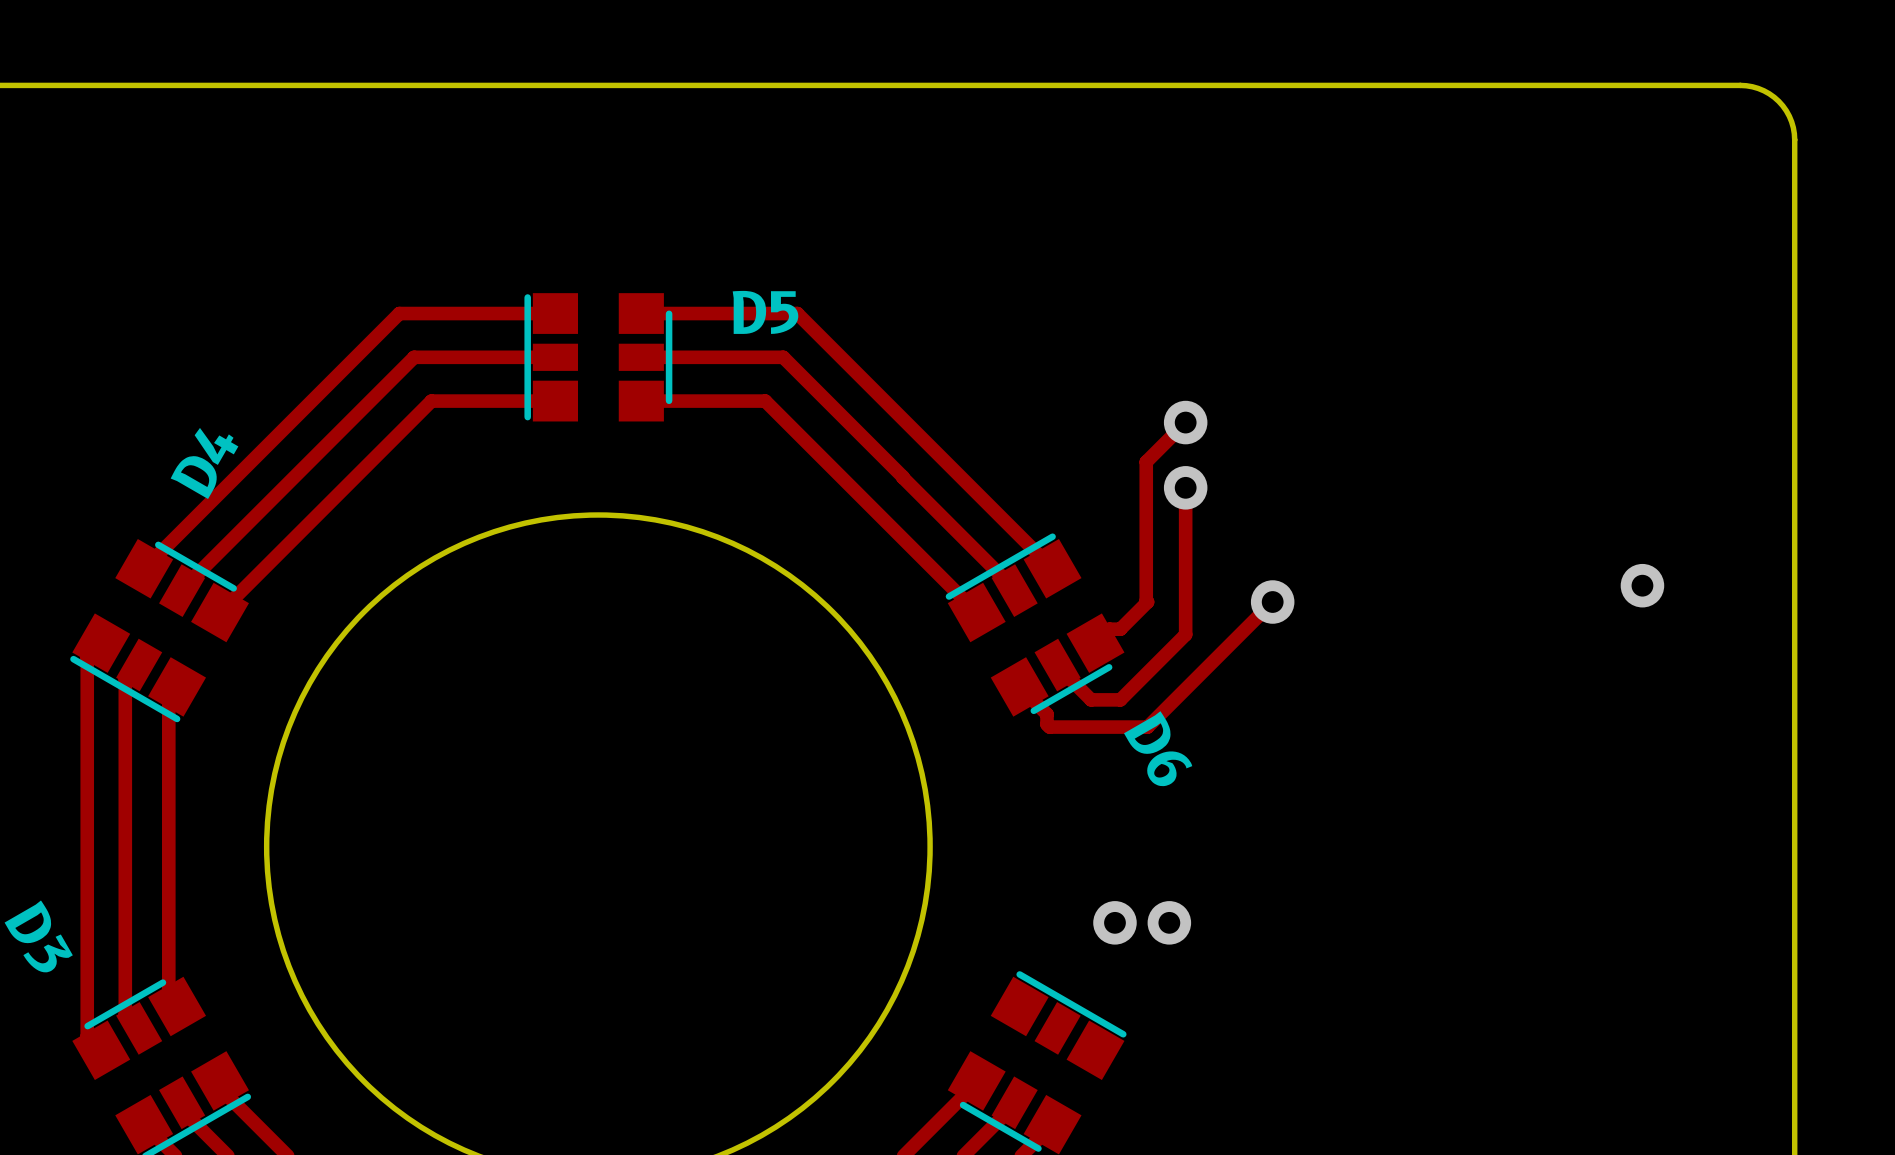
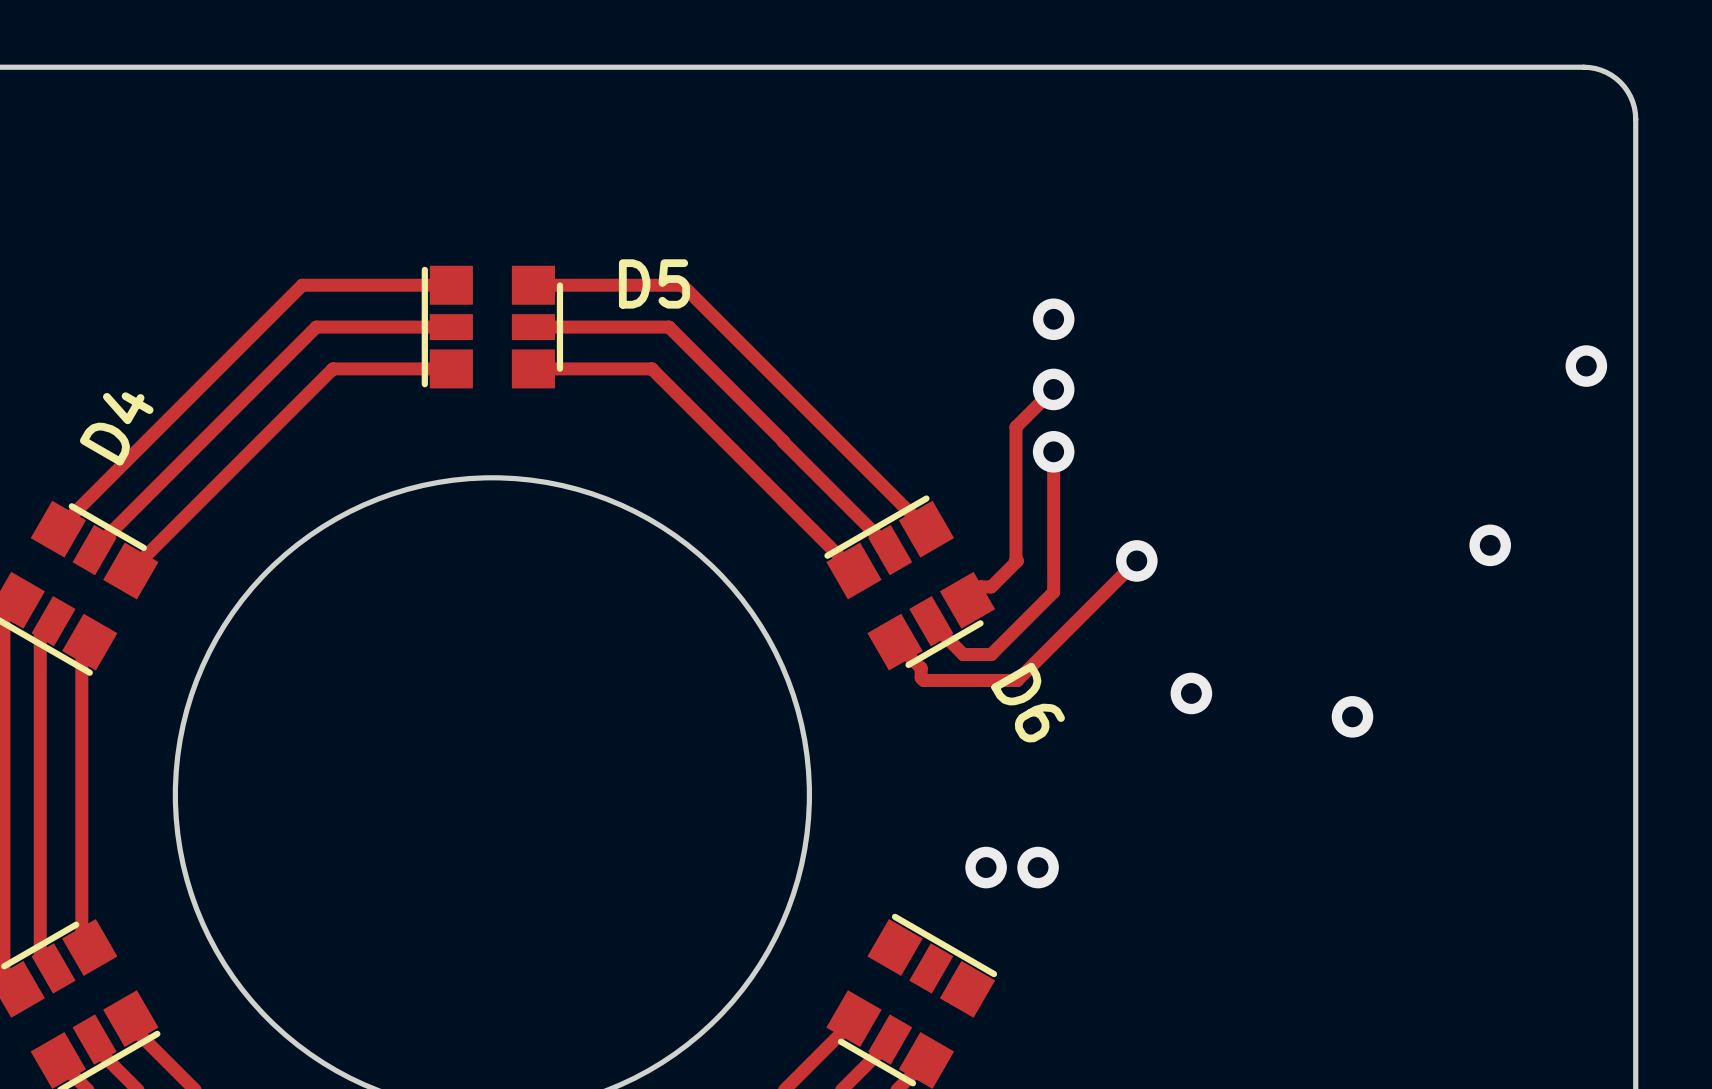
via: none -> (1053, 319)
via: none -> (1586, 366)
via: none -> (1191, 693)
via: none -> (1352, 716)

